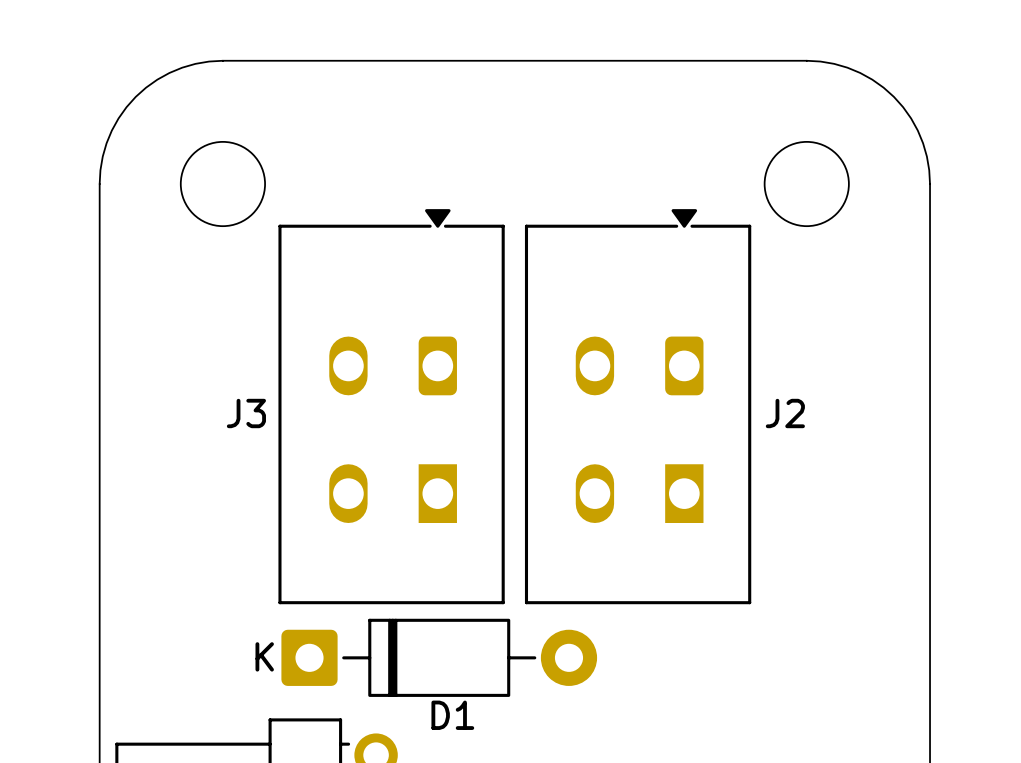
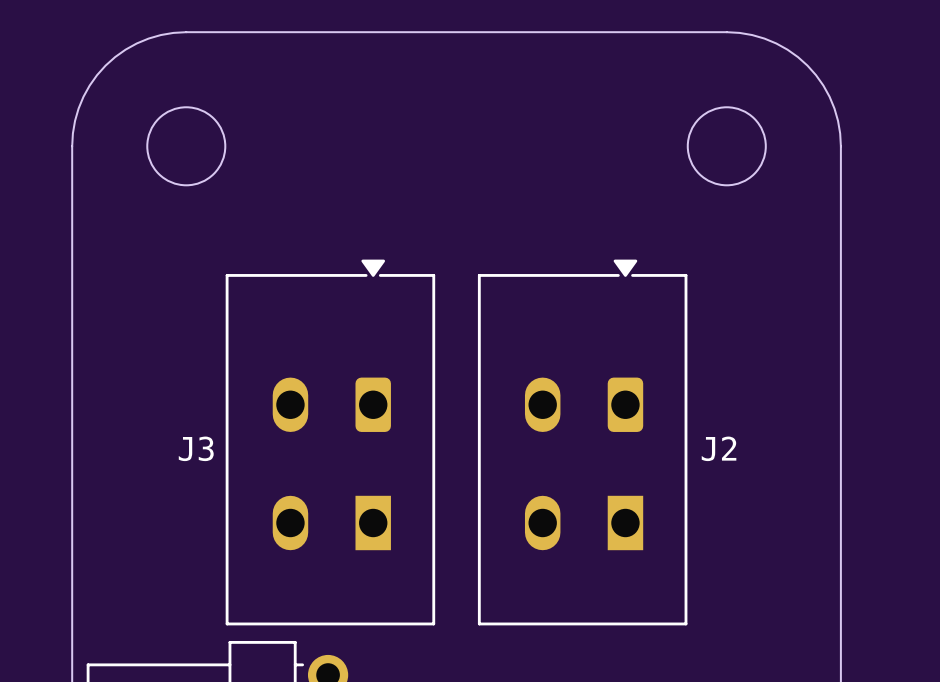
J3 position: (391, 406) -> (330, 442)
J2 position: (638, 406) -> (582, 442)
D1: (439, 657) -> none

